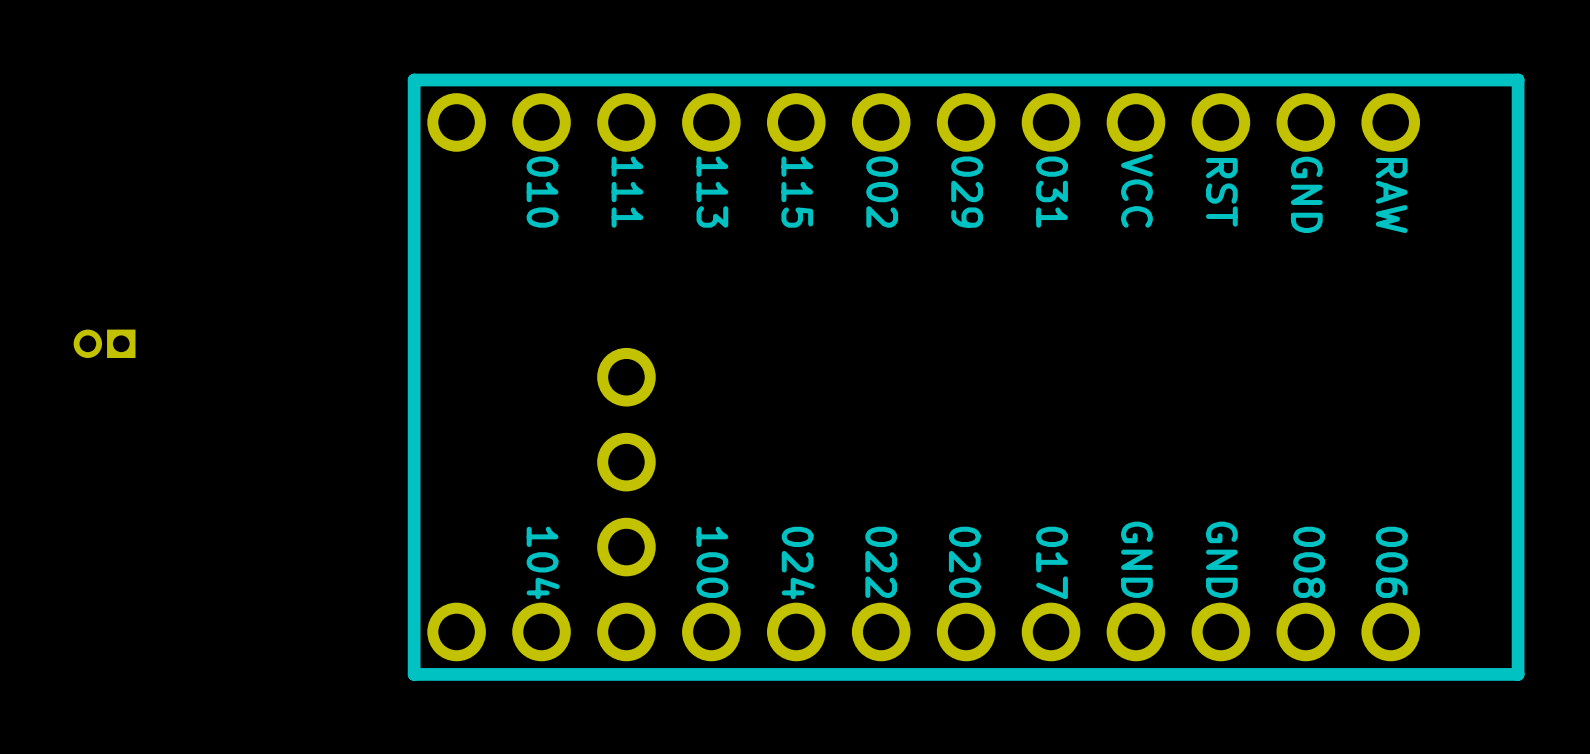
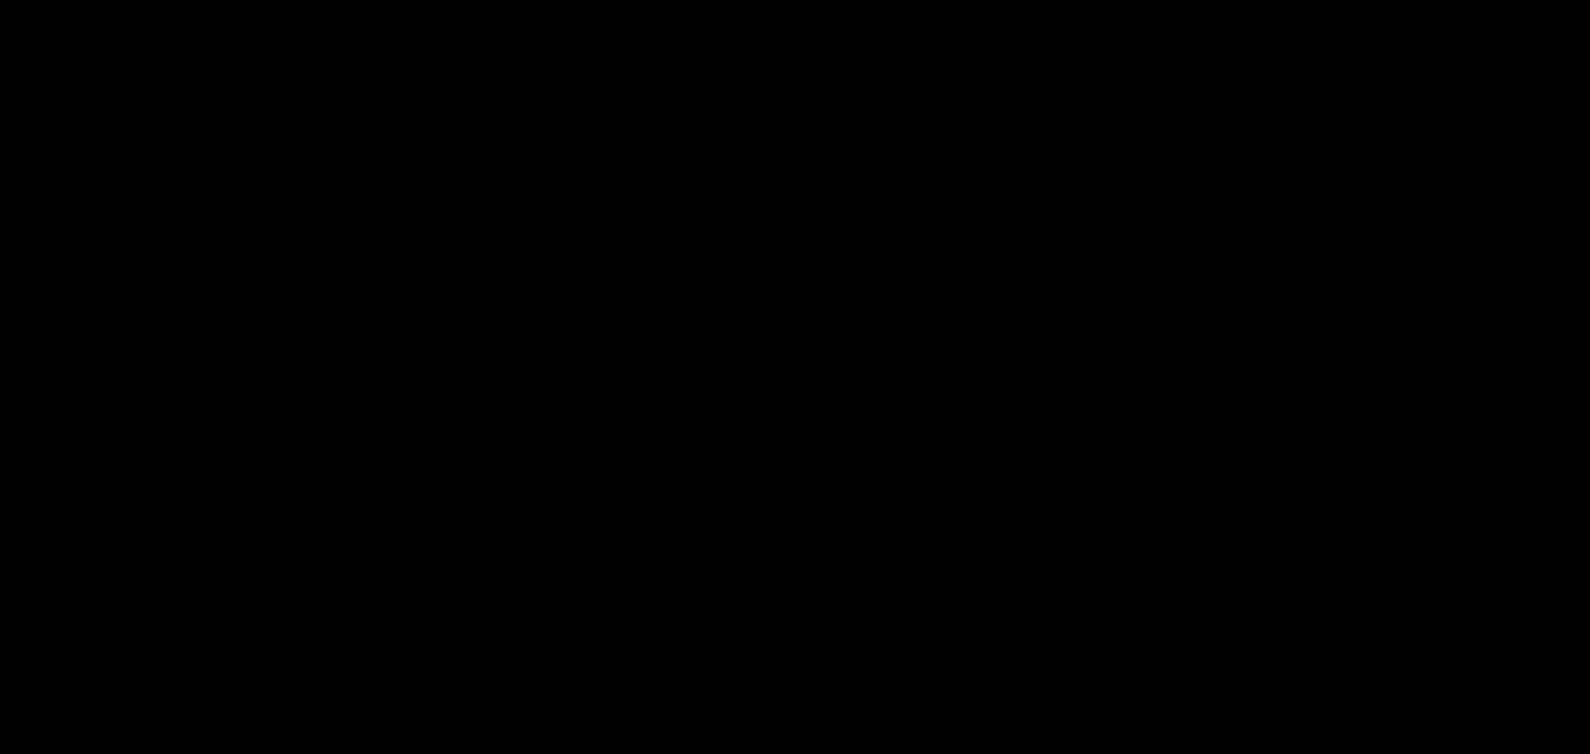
part: (104, 343) -> none
part: (966, 377) -> none

